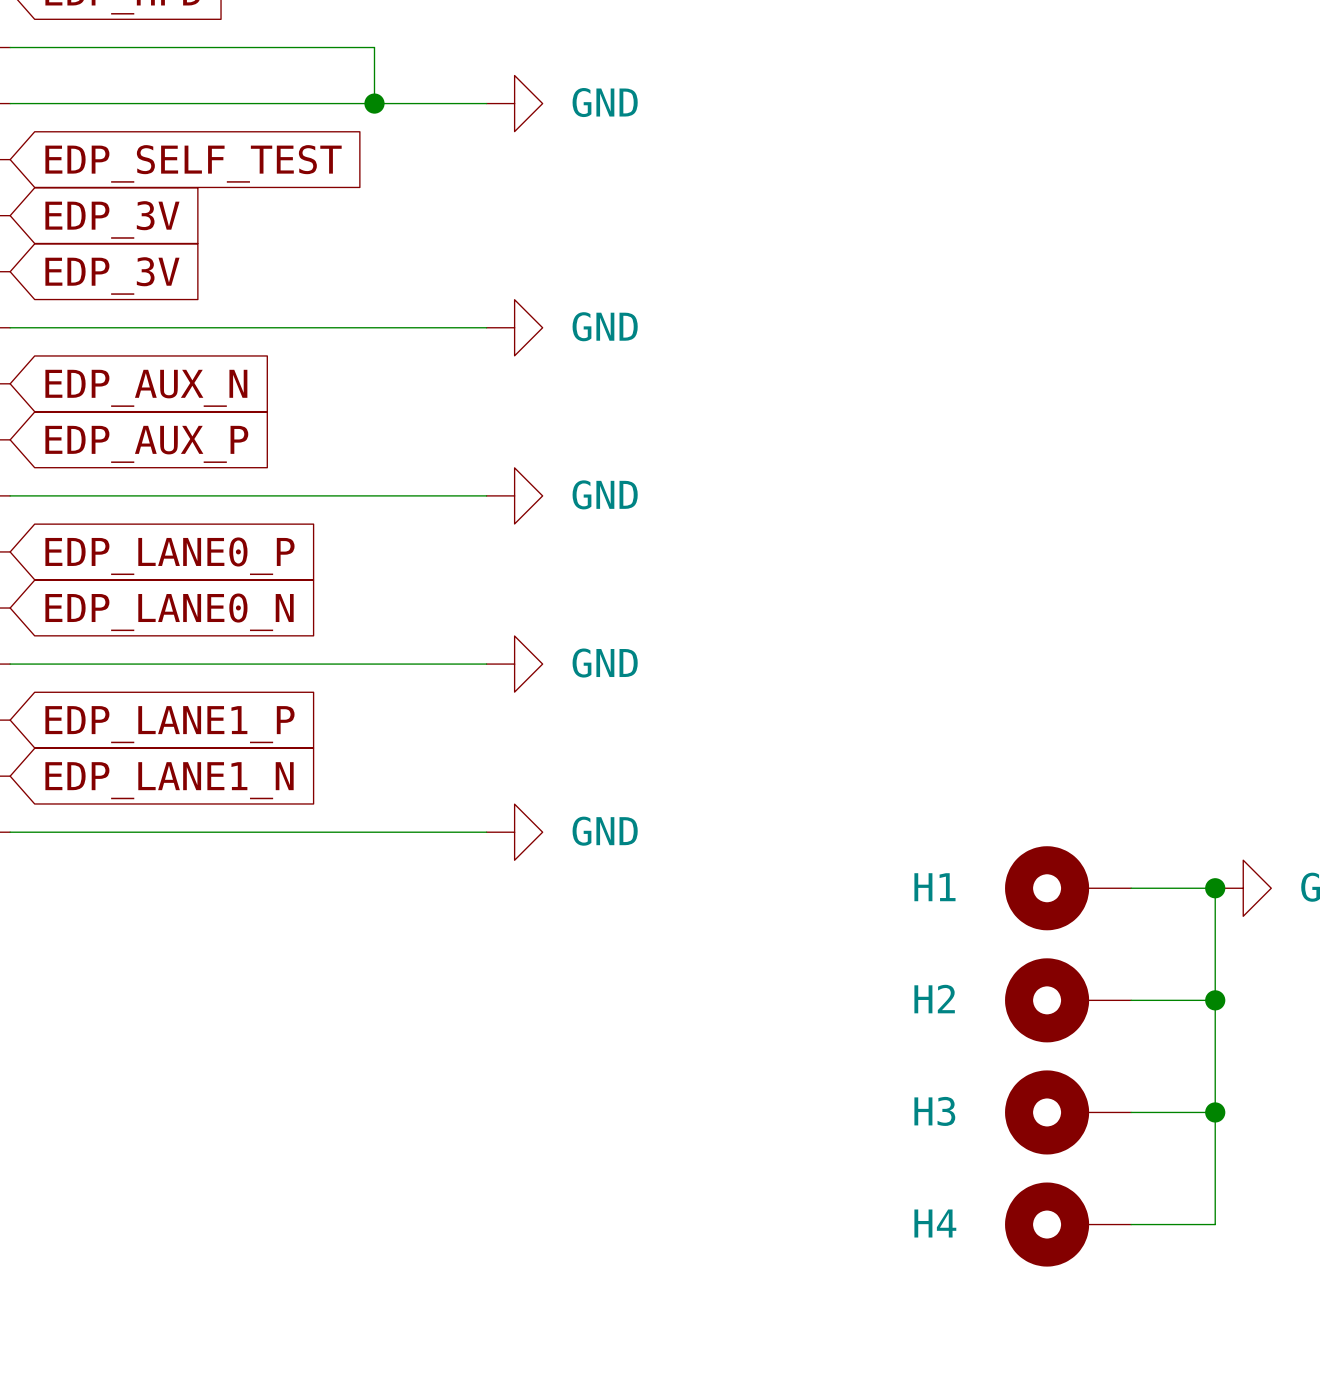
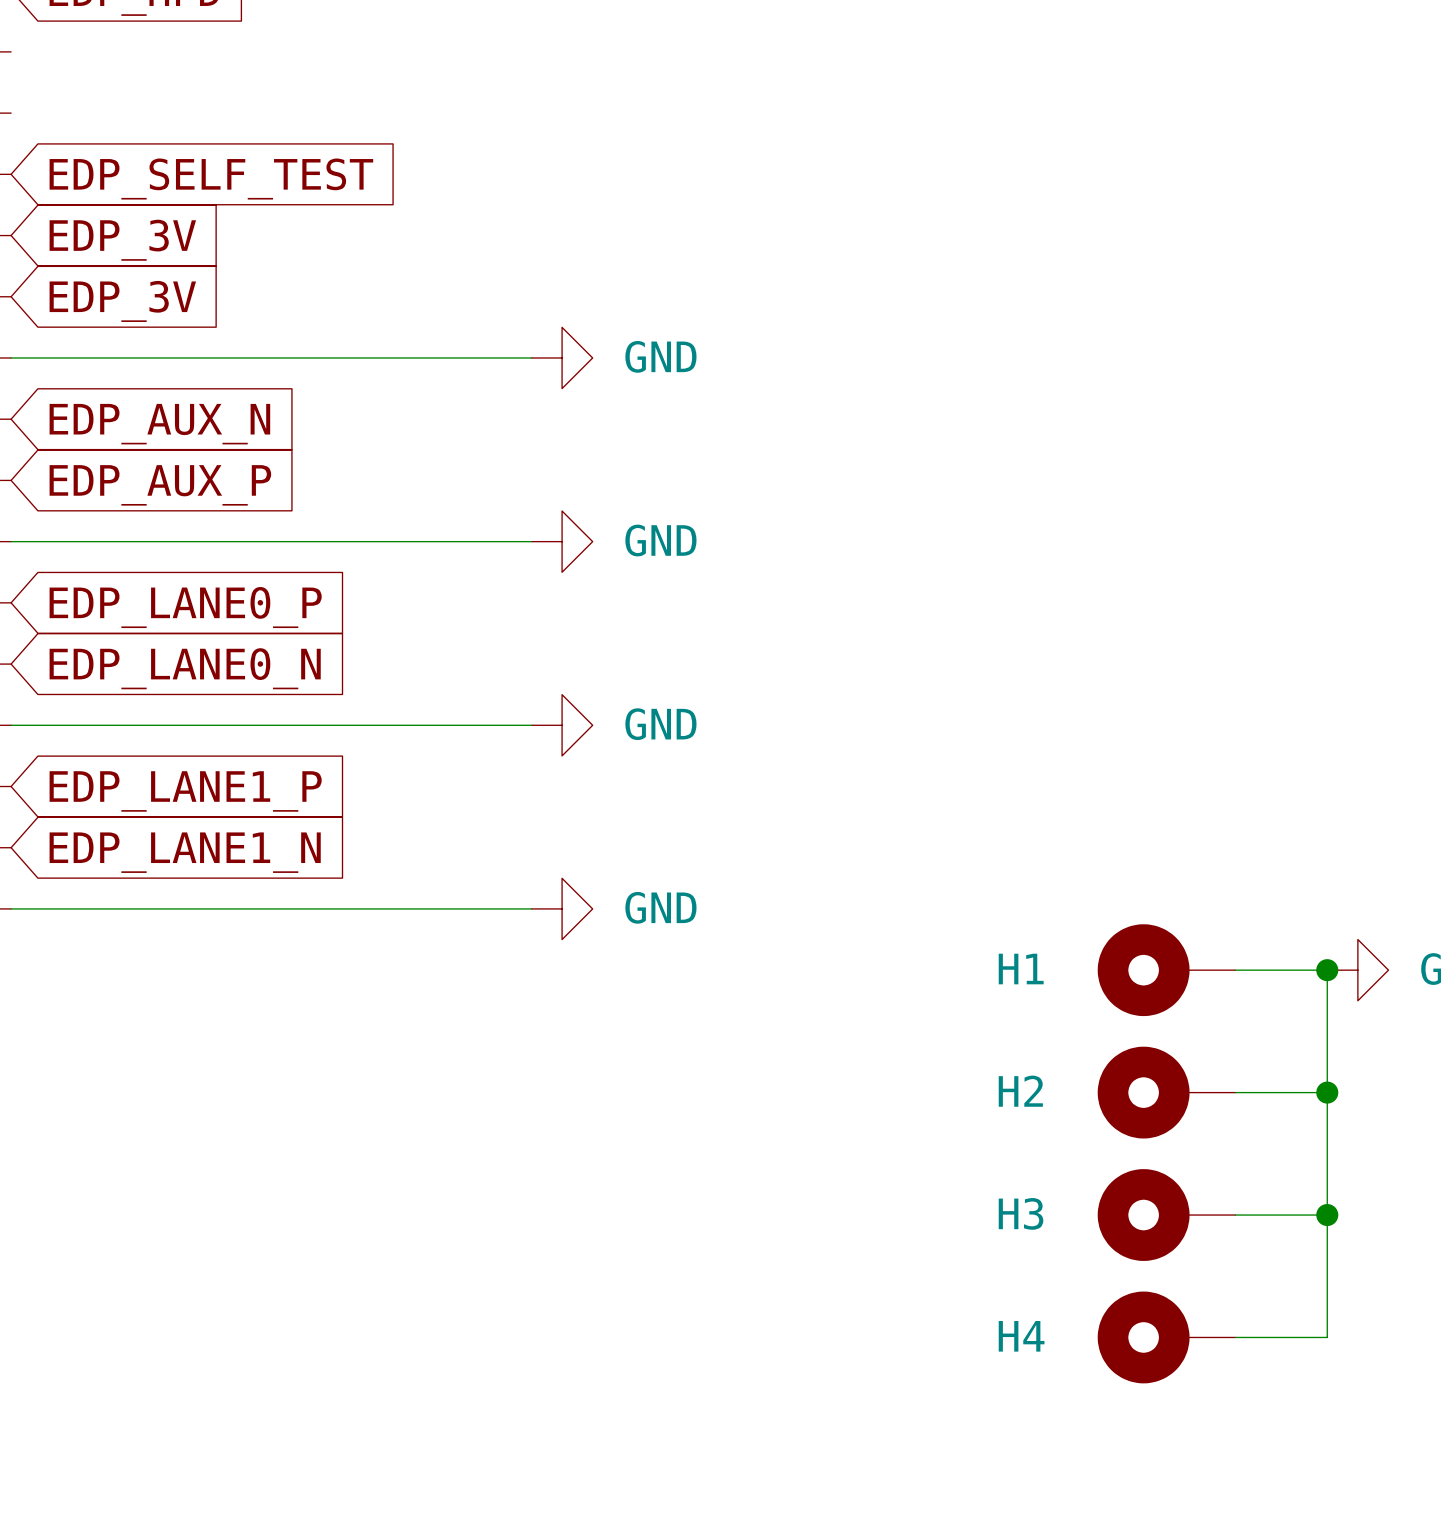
wire: (10, 47) (374, 47) (374, 103) -> none
wire: (10, 103) (486, 103) -> none
junction: (374, 103) -> none
power symbol: GND (514, 103) -> none

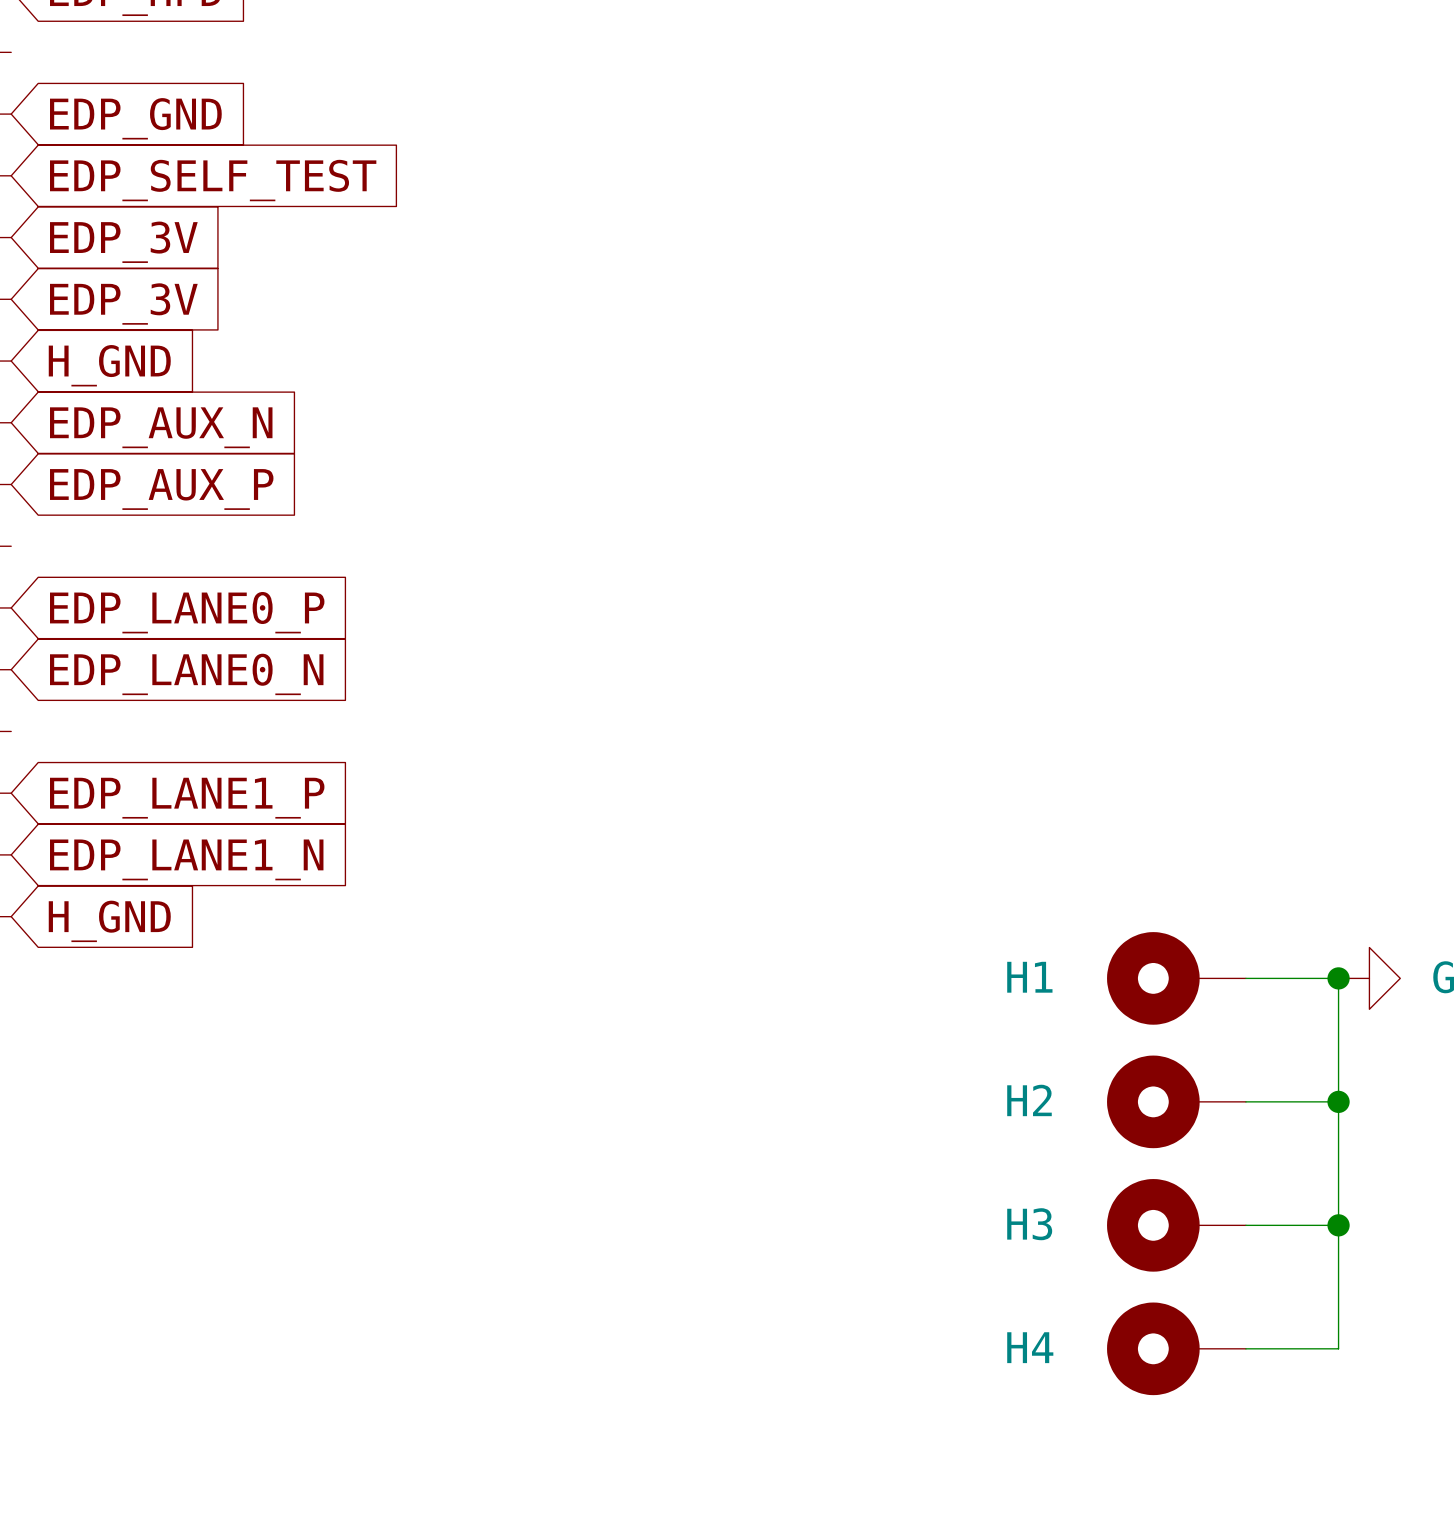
global label: none -> EDP_GND (135, 118)
wire: (11, 357) (531, 357) -> none
power symbol: GND (562, 357) -> none
global label: none -> H_GND (109, 365)
wire: (11, 541) (531, 541) -> none
power symbol: GND (562, 541) -> none
wire: (11, 725) (531, 725) -> none
power symbol: GND (562, 725) -> none
wire: (11, 908) (531, 908) -> none
power symbol: GND (562, 908) -> none
global label: none -> H_GND (109, 921)

